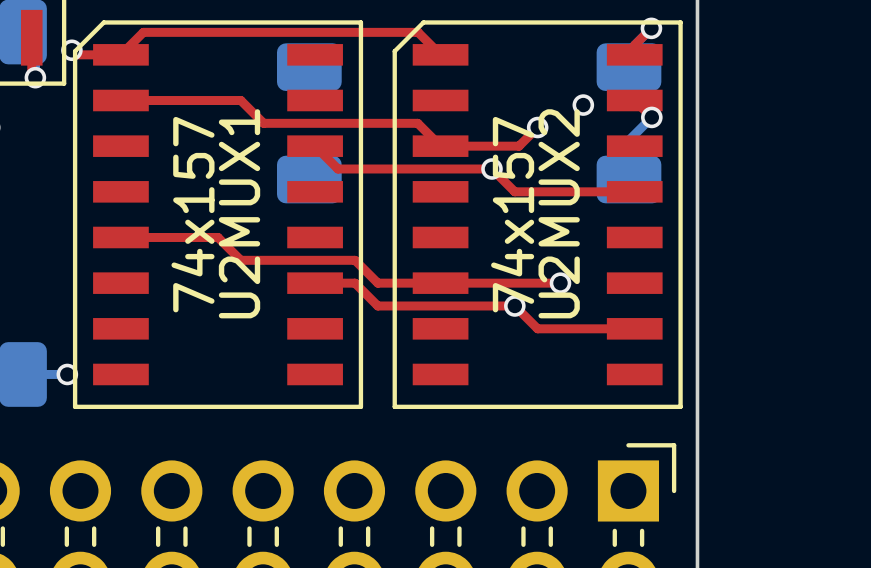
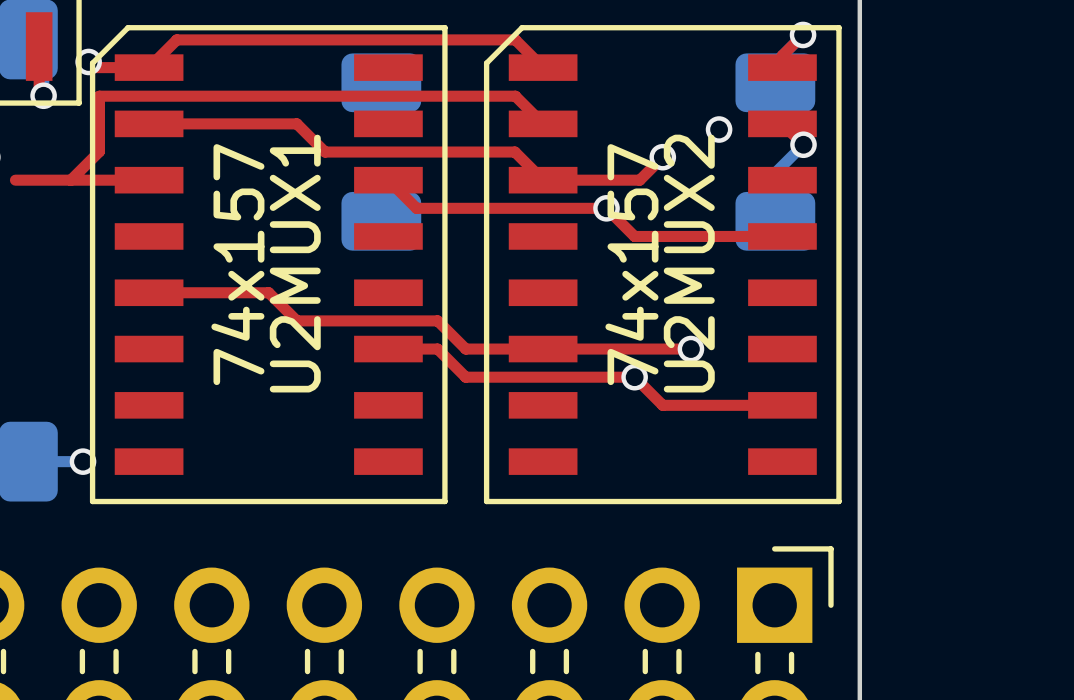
top track: none -> (543, 123) (515, 96) (99, 96) (99, 151) (70, 180)
top track: none -> (15, 180) (149, 180)

